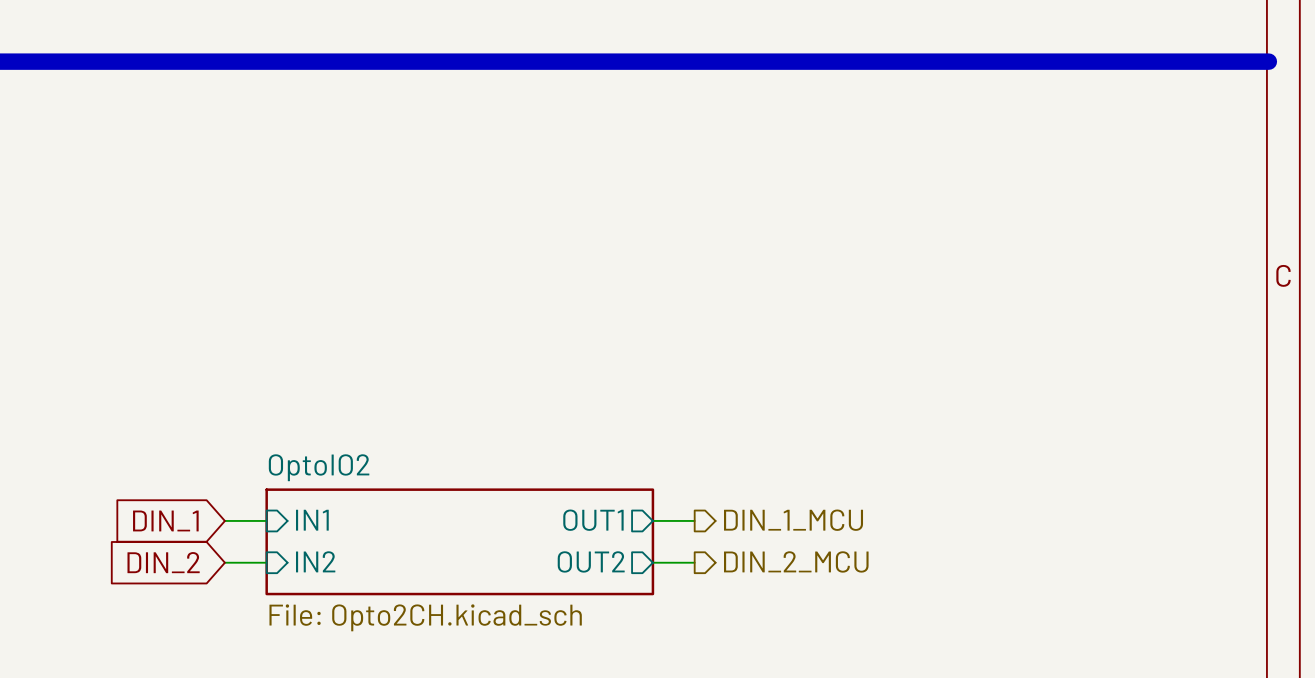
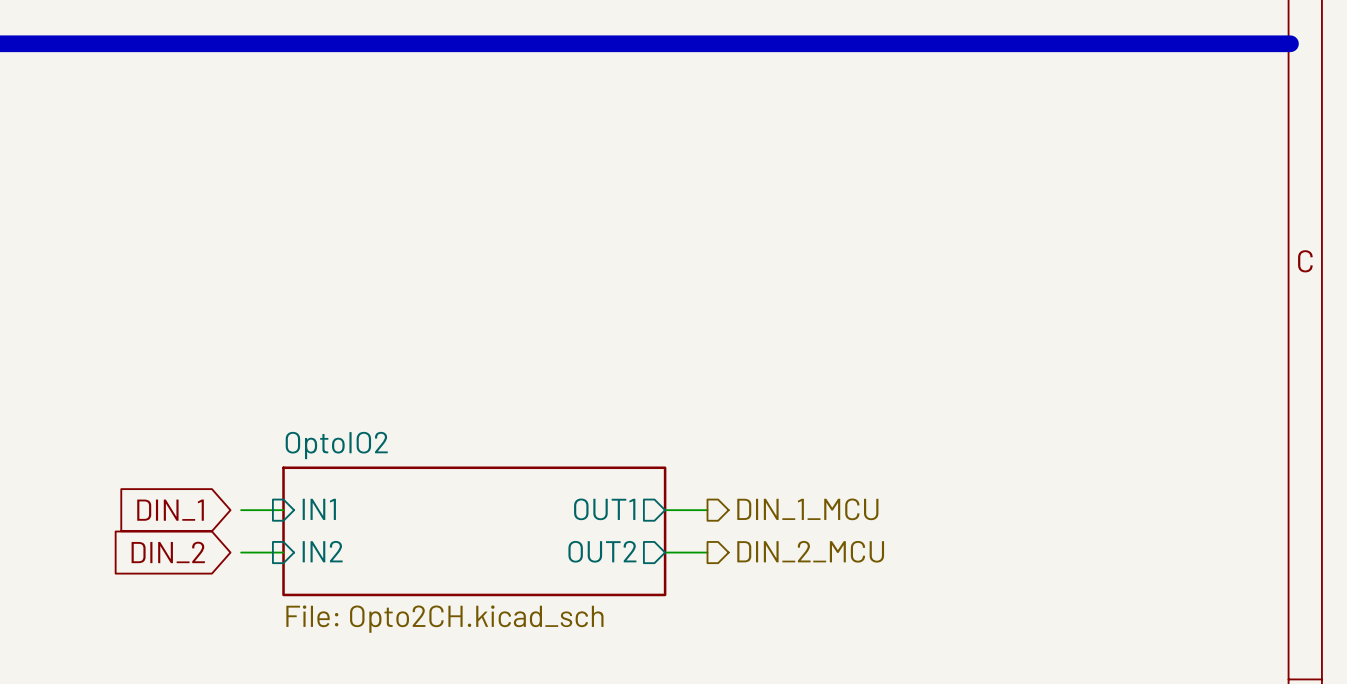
sheet OptoIO2 name position: OptoIO2 (319, 467) -> OptoIO2 (336, 445)
sheet OptoIO2 shape: [265, 488, 655, 596] -> [282, 466, 667, 597]
wire: (224, 520) (235, 520) -> (272, 510) (283, 510)
wire: (224, 562) (235, 562) -> (272, 552) (283, 552)
sheet OptoIO2 value position: File: Opto2CH.kicad_sch (425, 617) -> File: Opto2CH.kicad_sch (444, 619)

